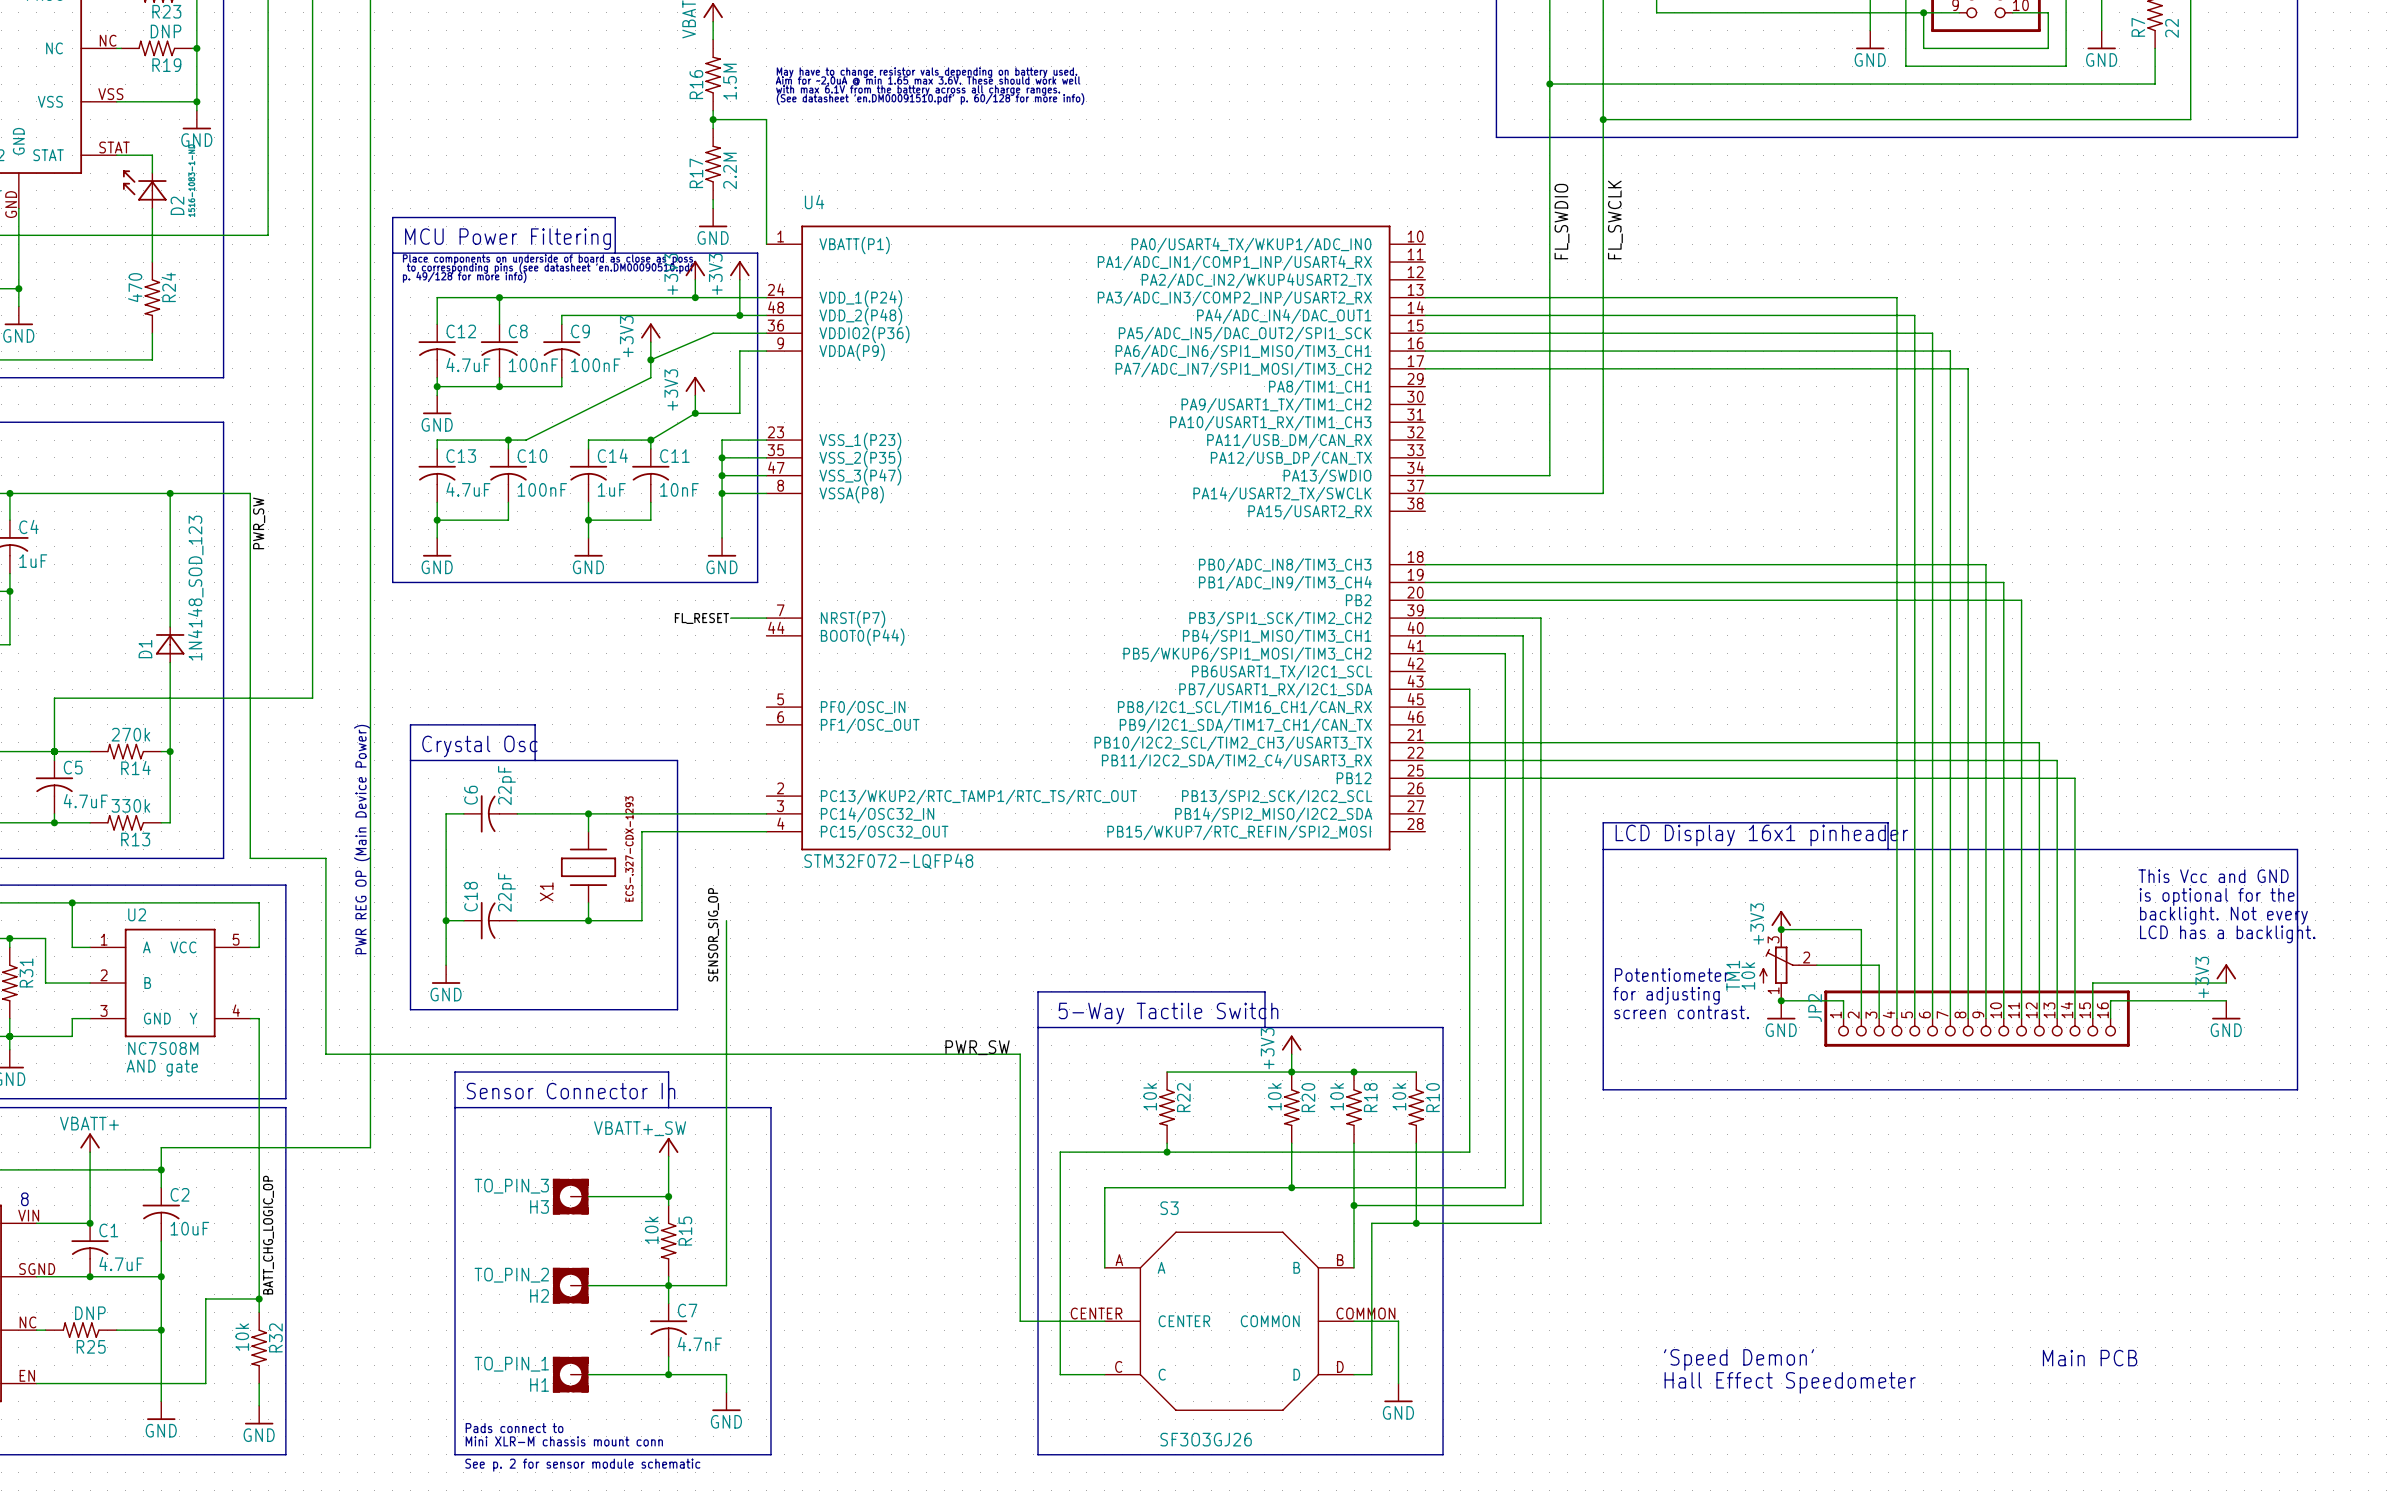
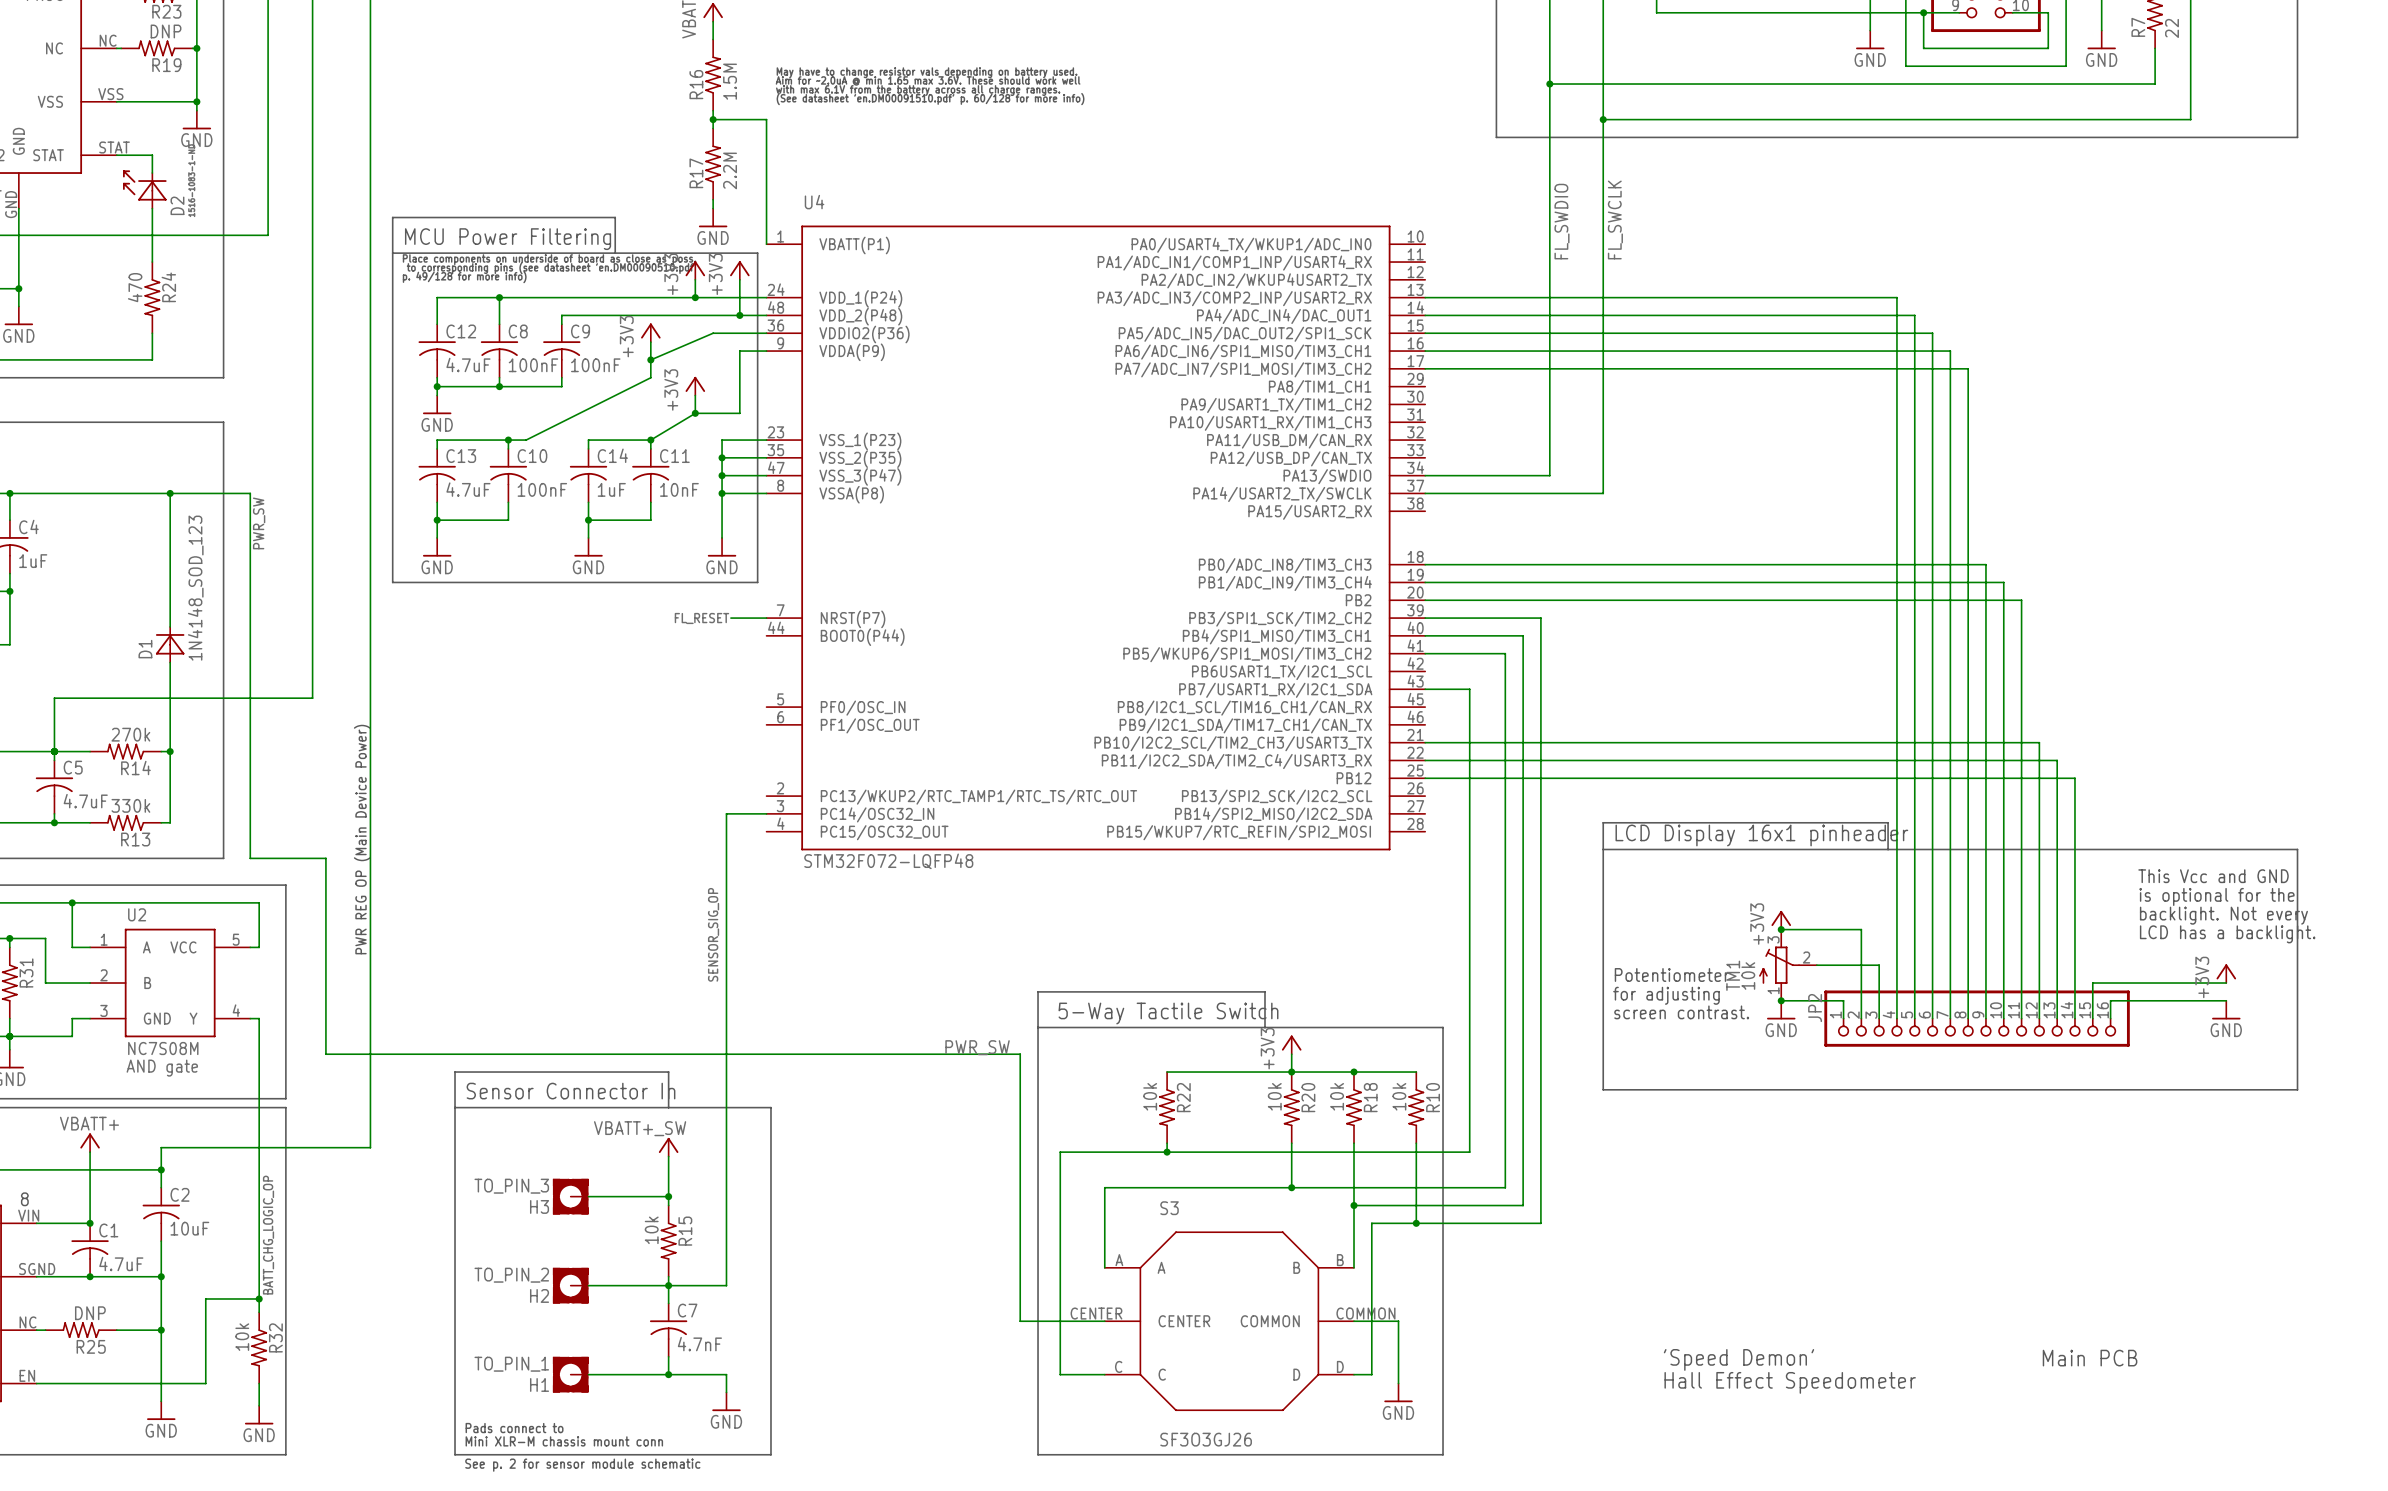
text: Crystal Osc (479, 746) -> none
line: (410, 760) (677, 760) (677, 1009) (410, 1009) (410, 724) (535, 724) (535, 760) -> none
wire: (463, 813) (446, 813) (446, 965) -> none
C6: 22pF (490, 813) -> none
wire: (517, 813) (726, 813) -> (726, 920) (726, 813)
wire: (588, 813) (588, 831) -> none
junction: (588, 813) -> none
wire: (766, 831) (641, 831) (641, 920) (517, 920) -> none
X1: (588, 867) -> none
wire: (588, 902) (588, 920) -> none
wire: (446, 920) (463, 920) -> none
junction: (446, 920) -> none
C18: 22pF (490, 920) -> none
junction: (588, 920) -> none
power symbol: GND (446, 974) -> none

